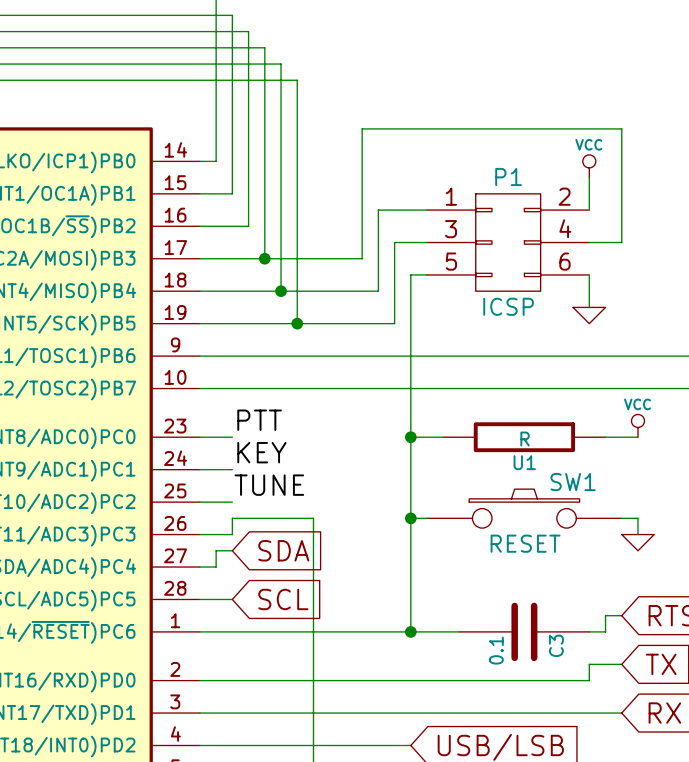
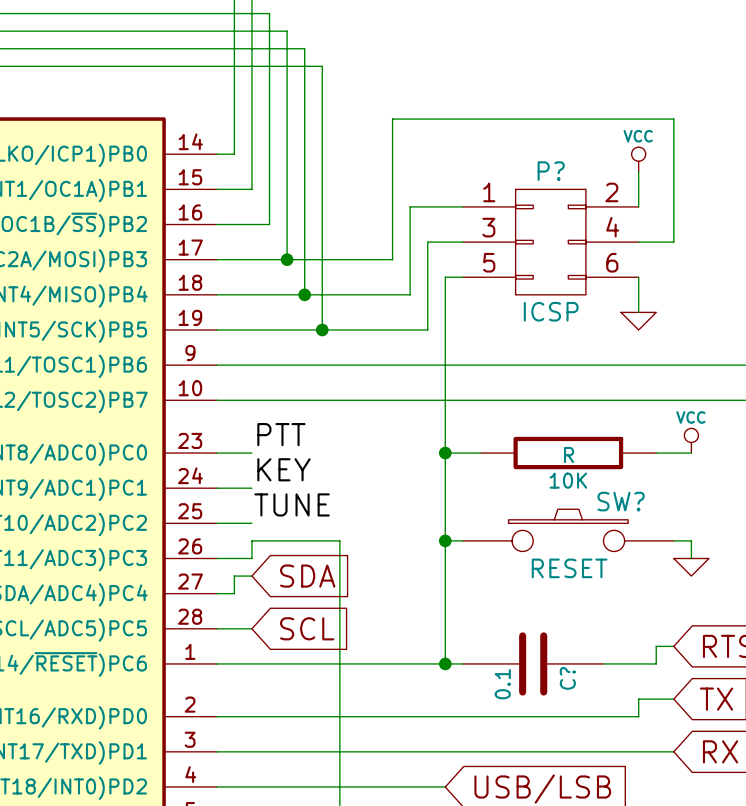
P1 name: P1 (508, 177) -> P? (551, 171)
U1 name: U1 (524, 462) -> 10K (568, 480)
SW1 name: SW1 (573, 482) -> SW? (621, 501)
C?: none -> 0.1 (533, 663)
C3: 0.1 (524, 631) -> none

